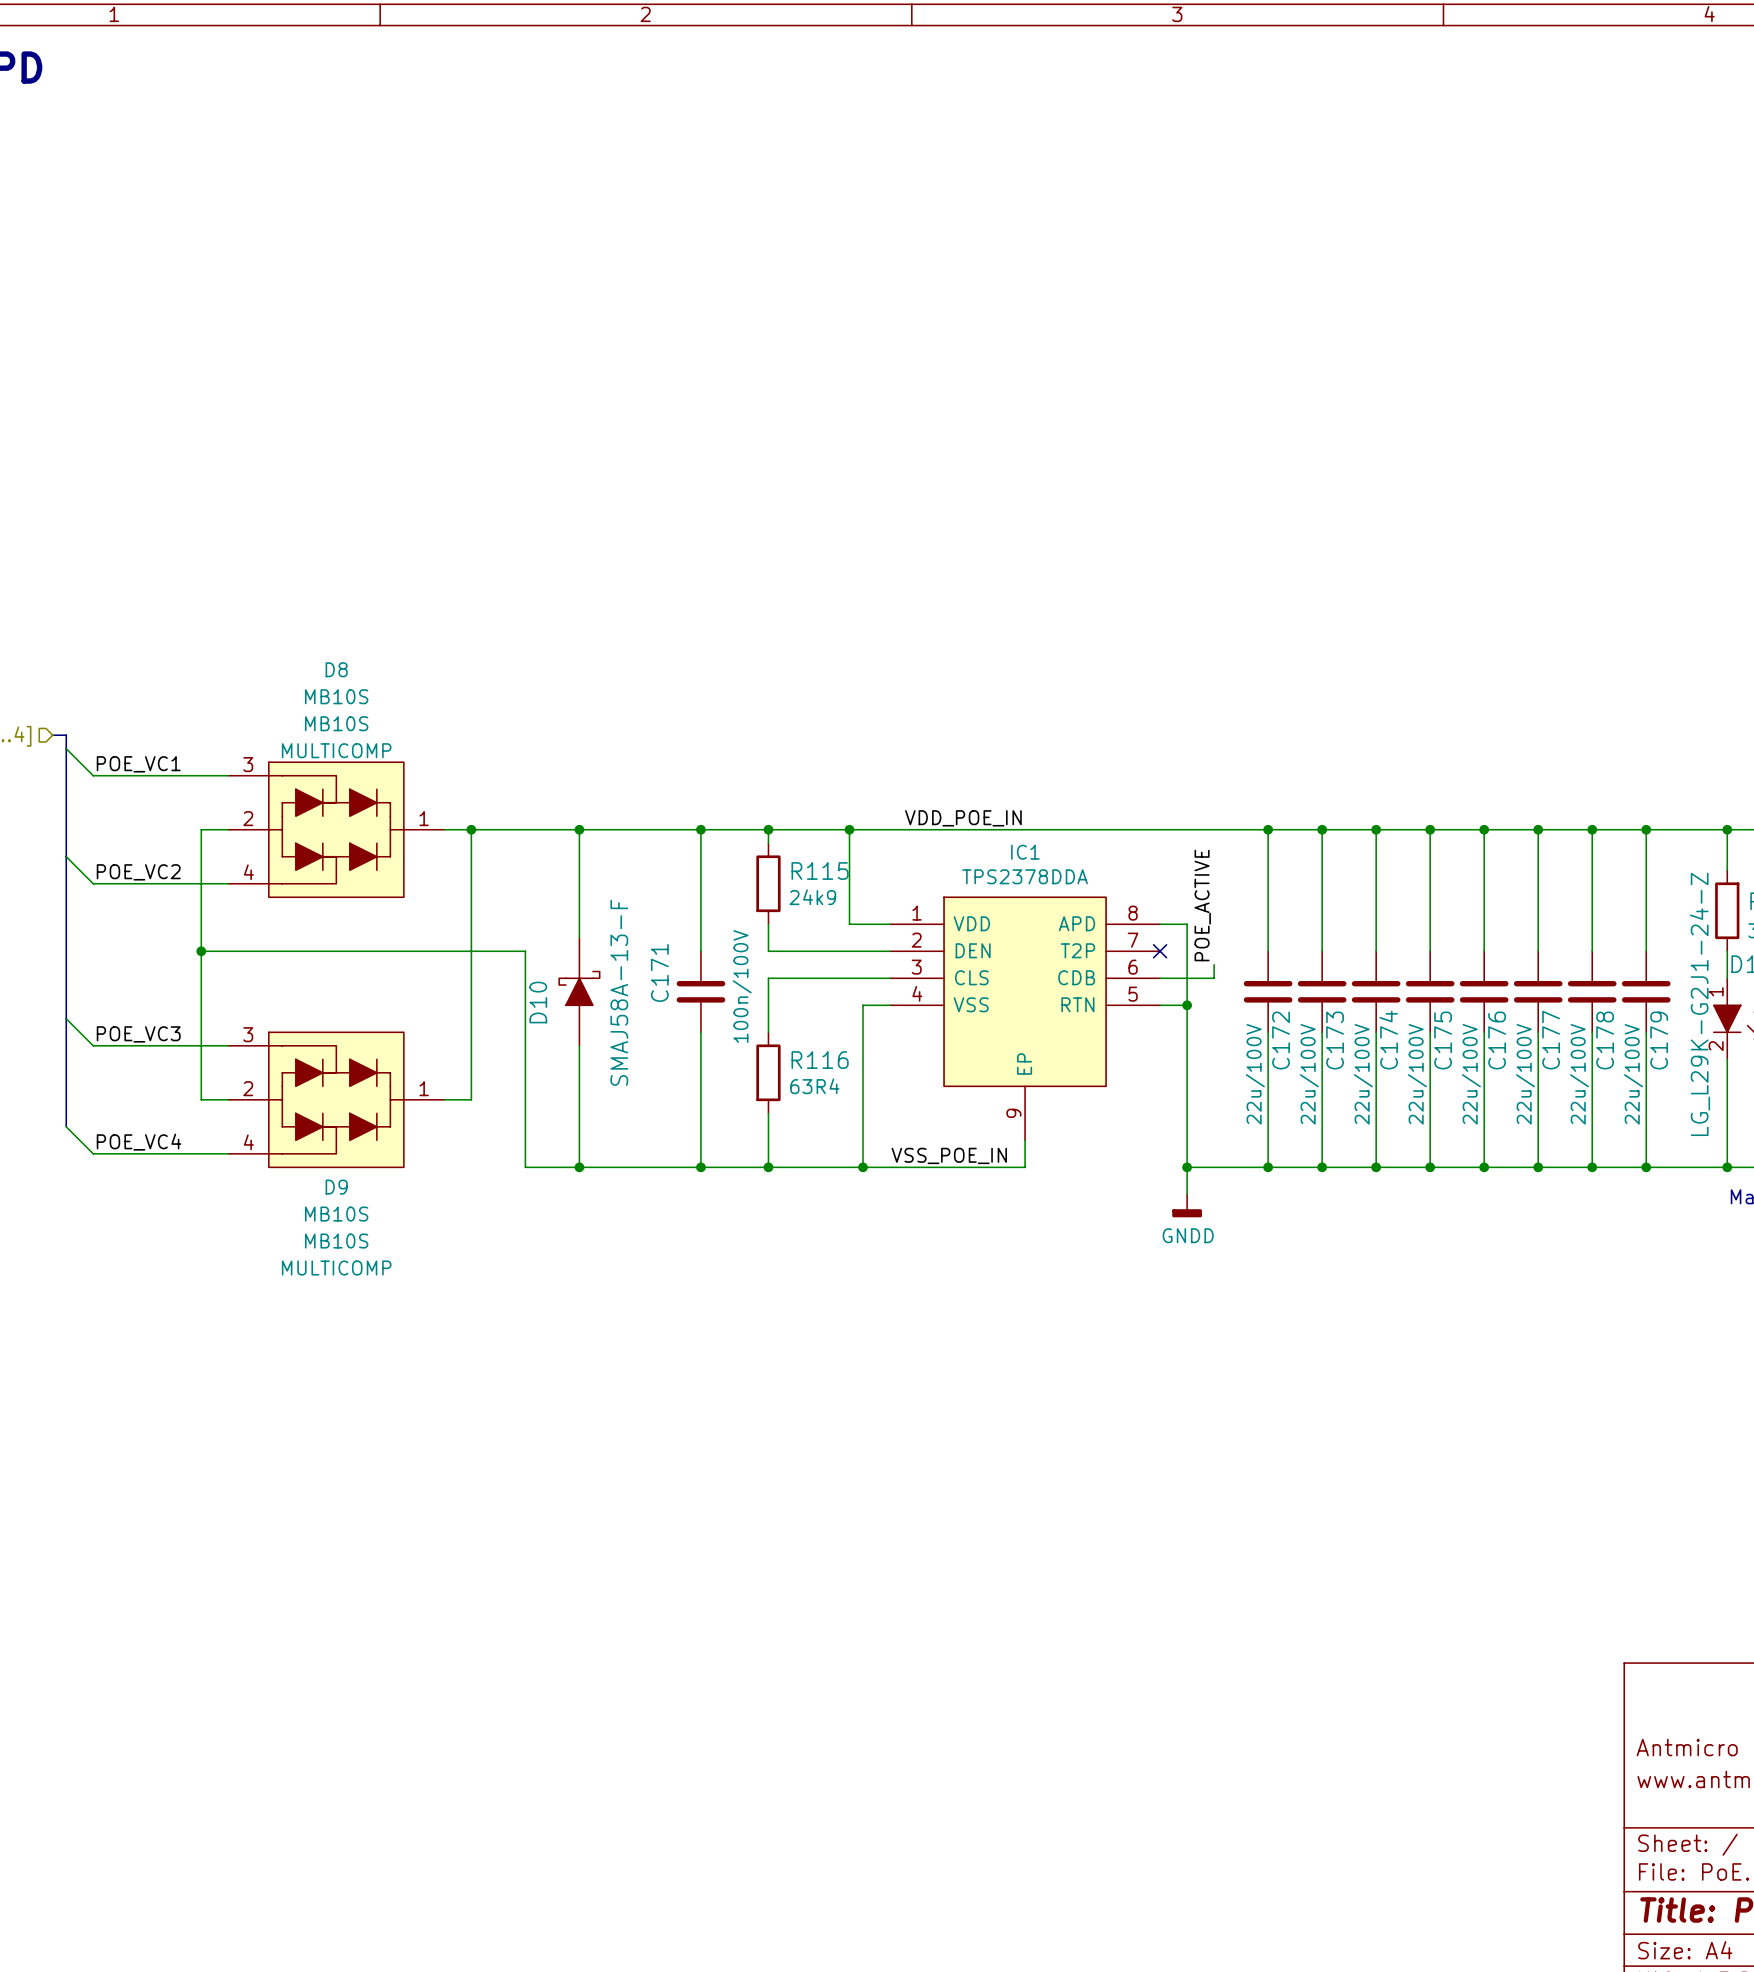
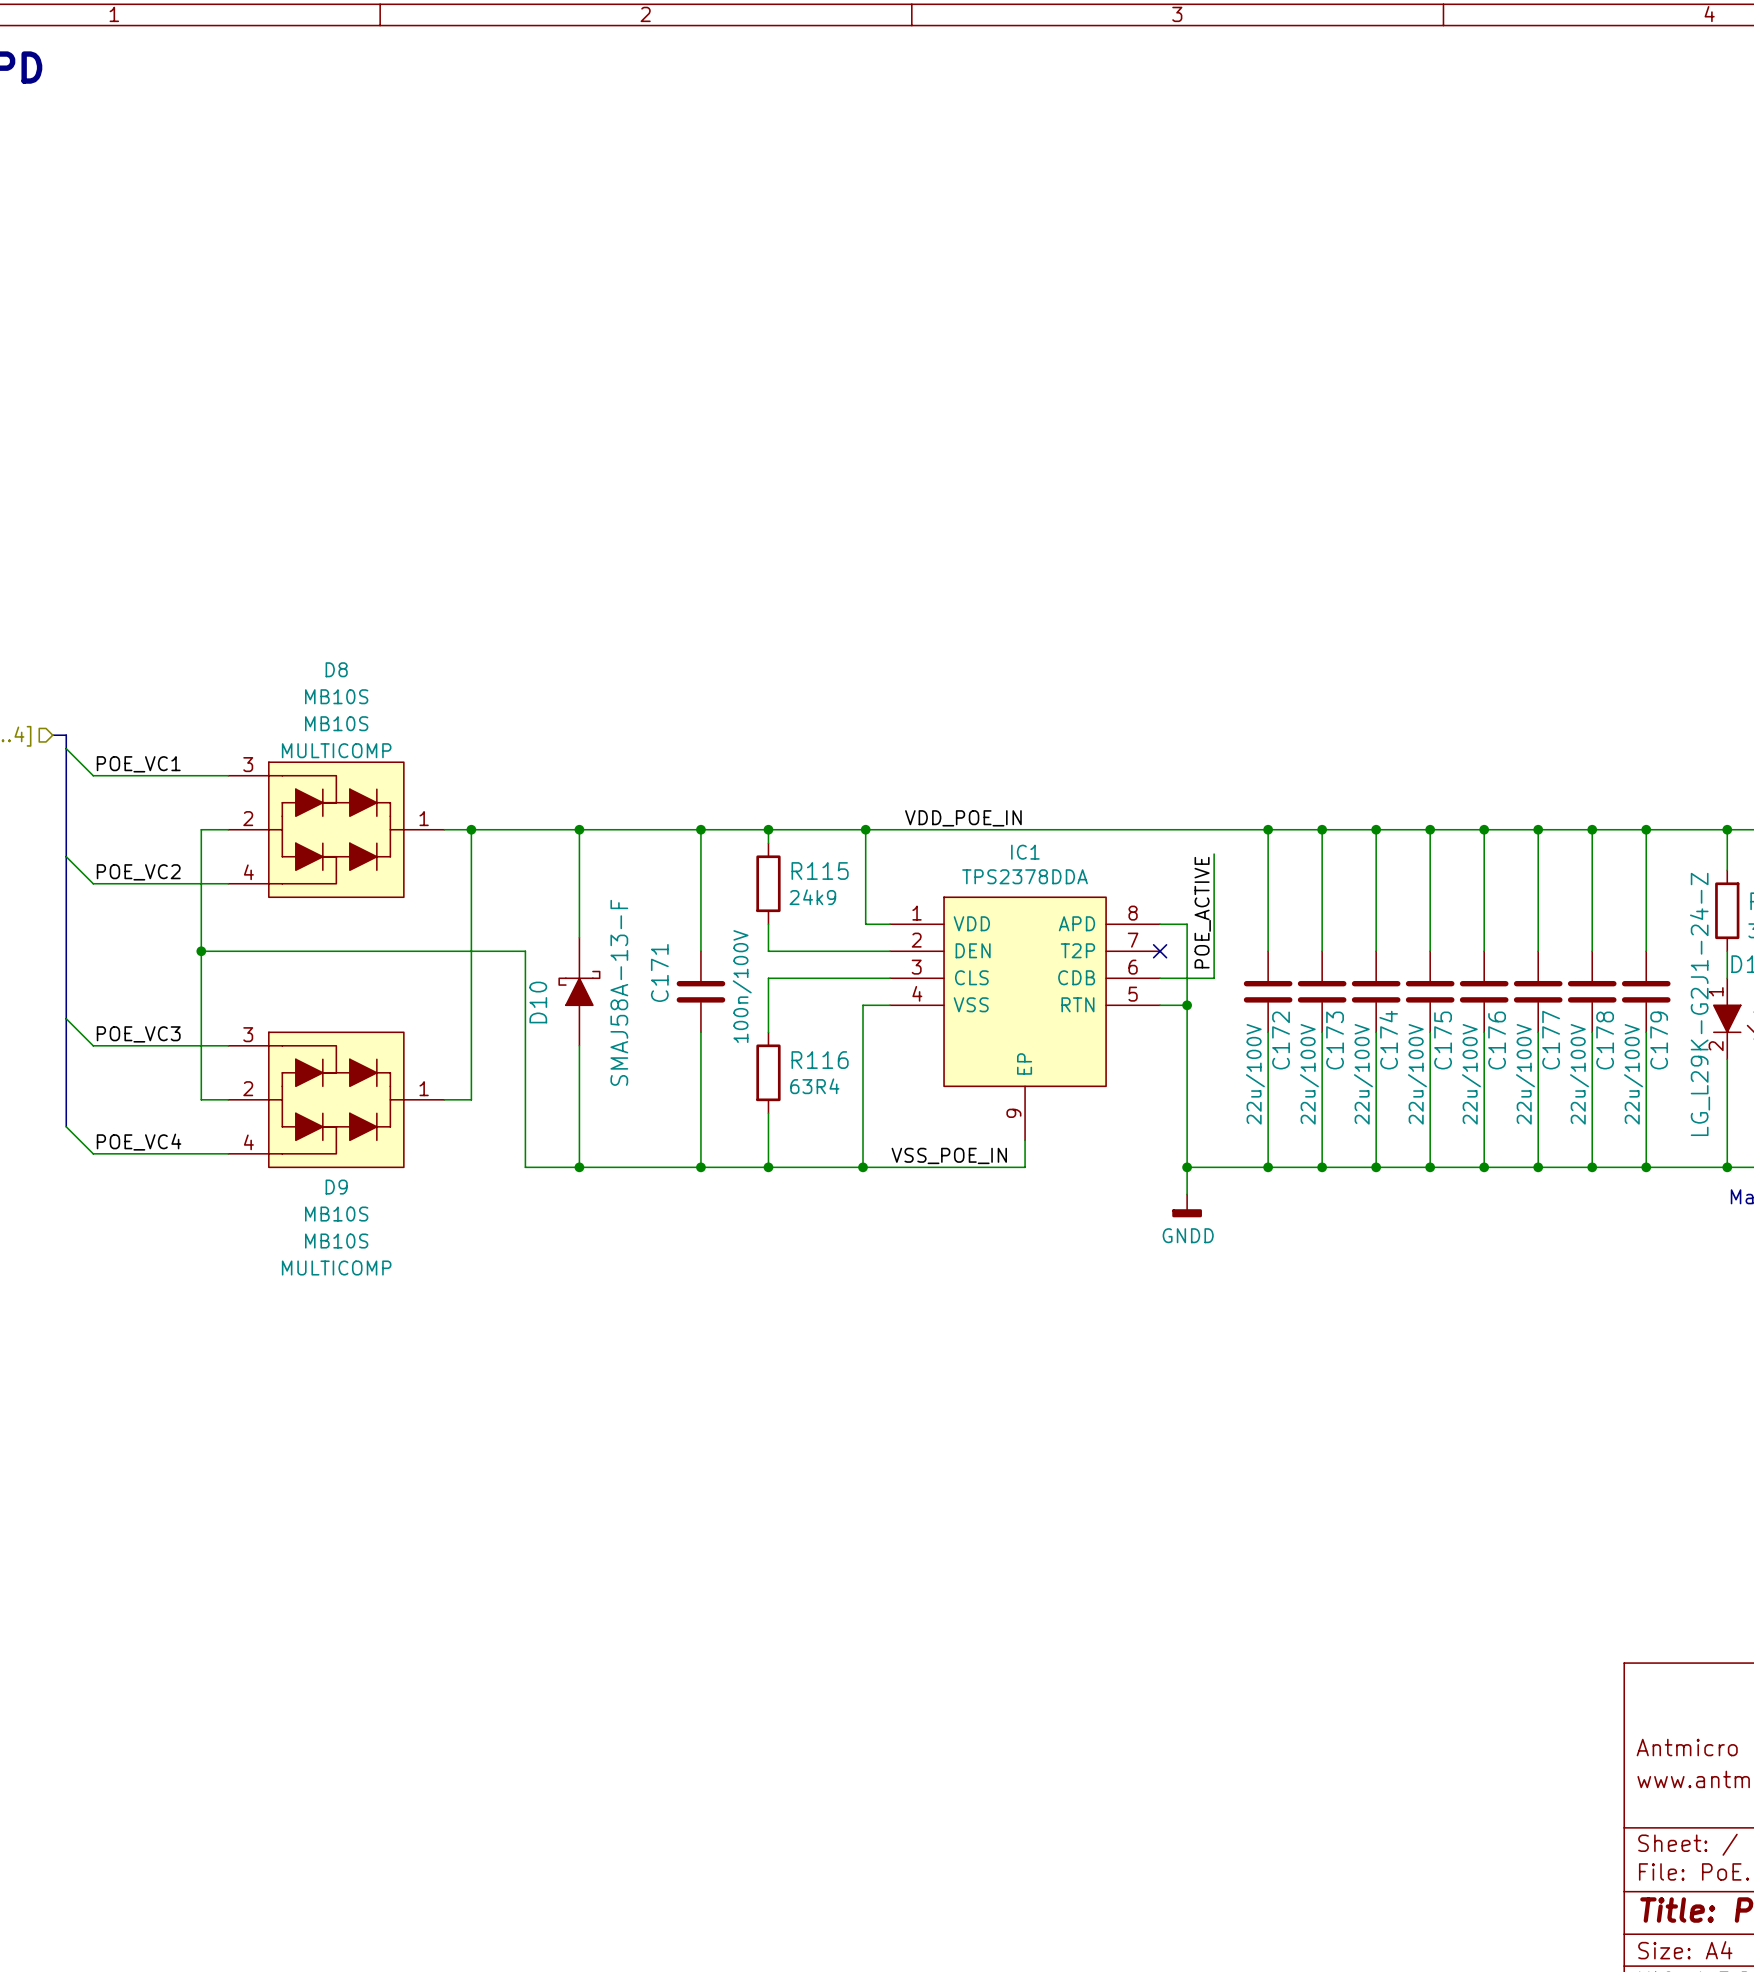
wire: (849, 829) (849, 924) (865, 924) -> (865, 829) (865, 924)
junction position: (849, 829) -> (865, 829)
wire: none -> (1214, 854) (1214, 964)
label position: POE_ACTIVE (1202, 905) -> POE_ACTIVE (1202, 912)

